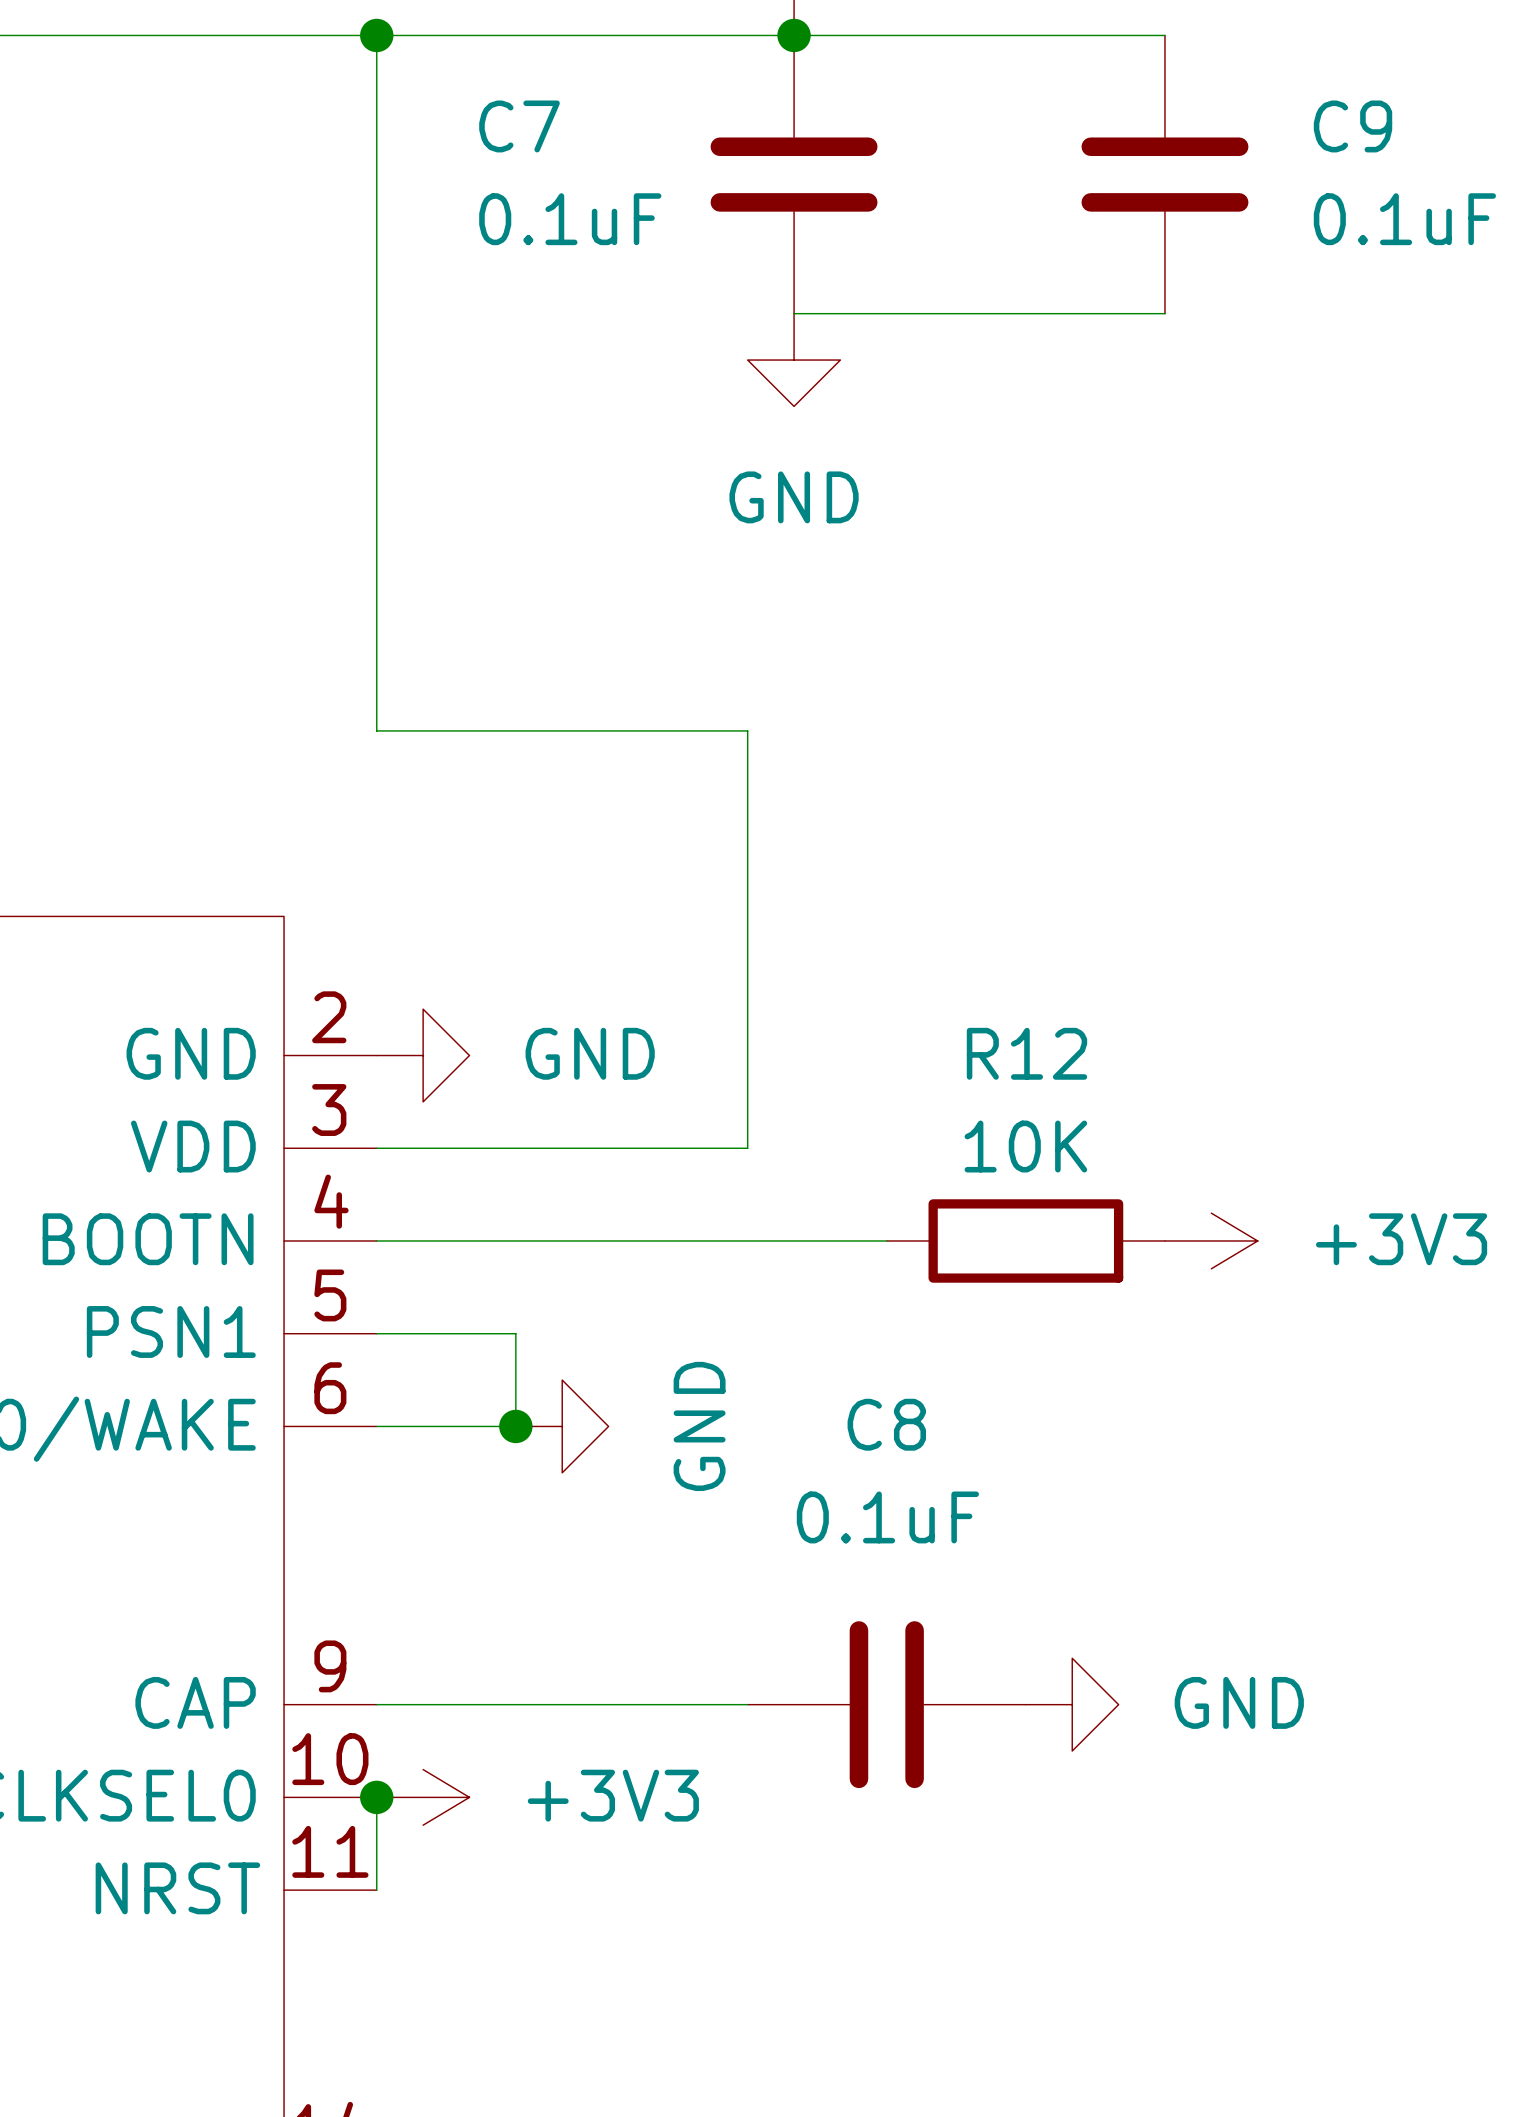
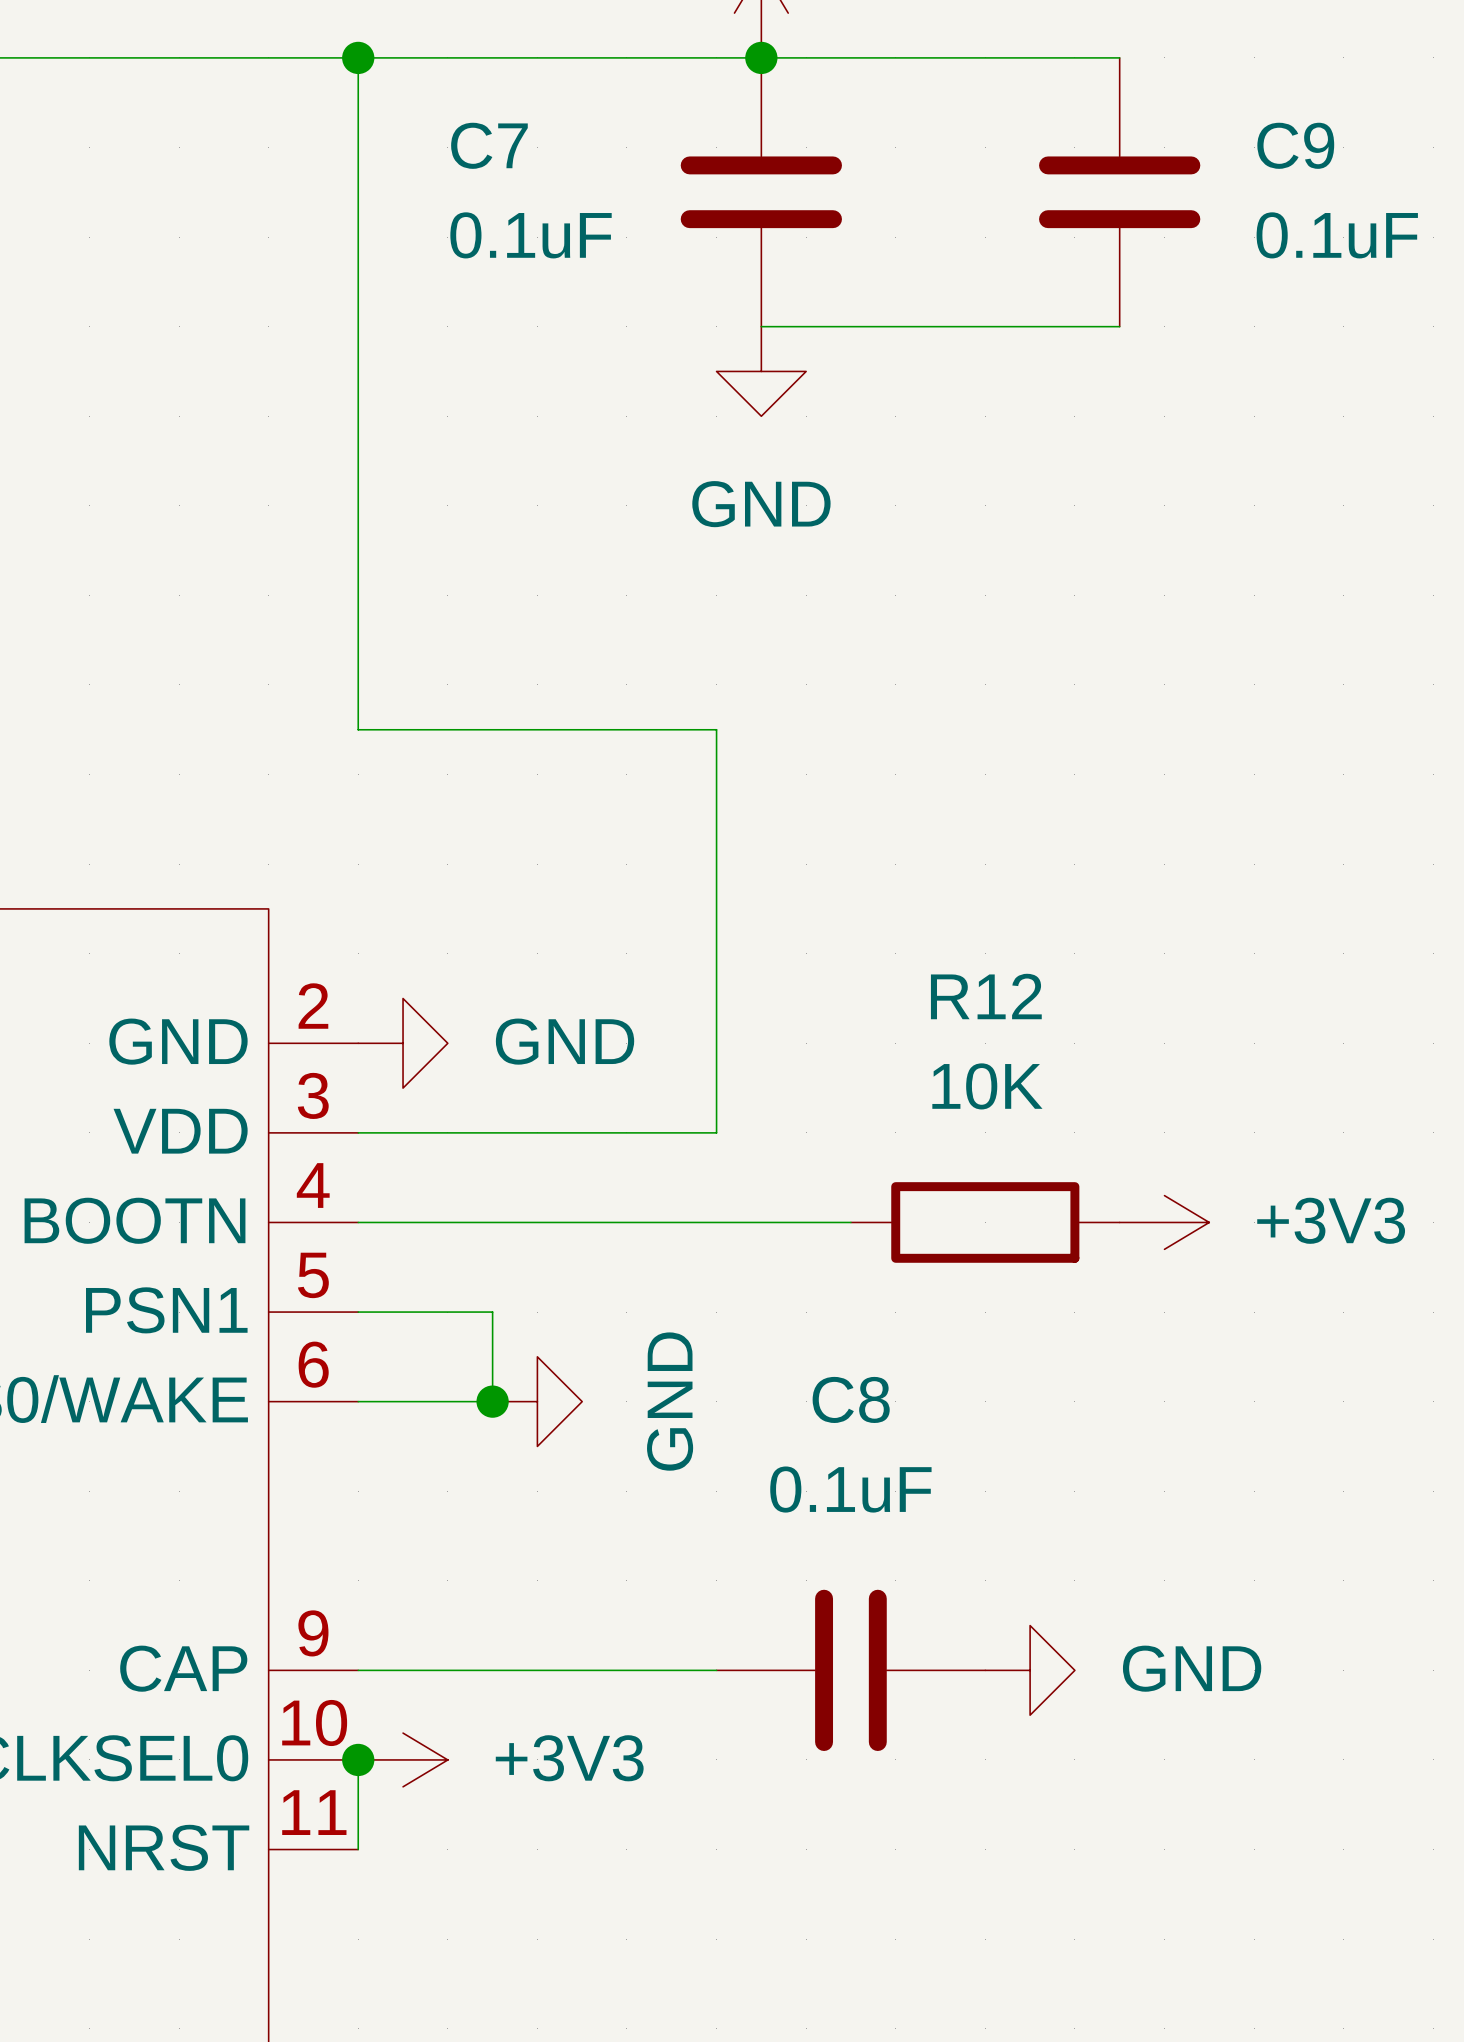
R12 name position: R12 (1026, 1053) -> R12 (986, 996)
R12 value position: 10K (1025, 1146) -> 10K (987, 1086)

